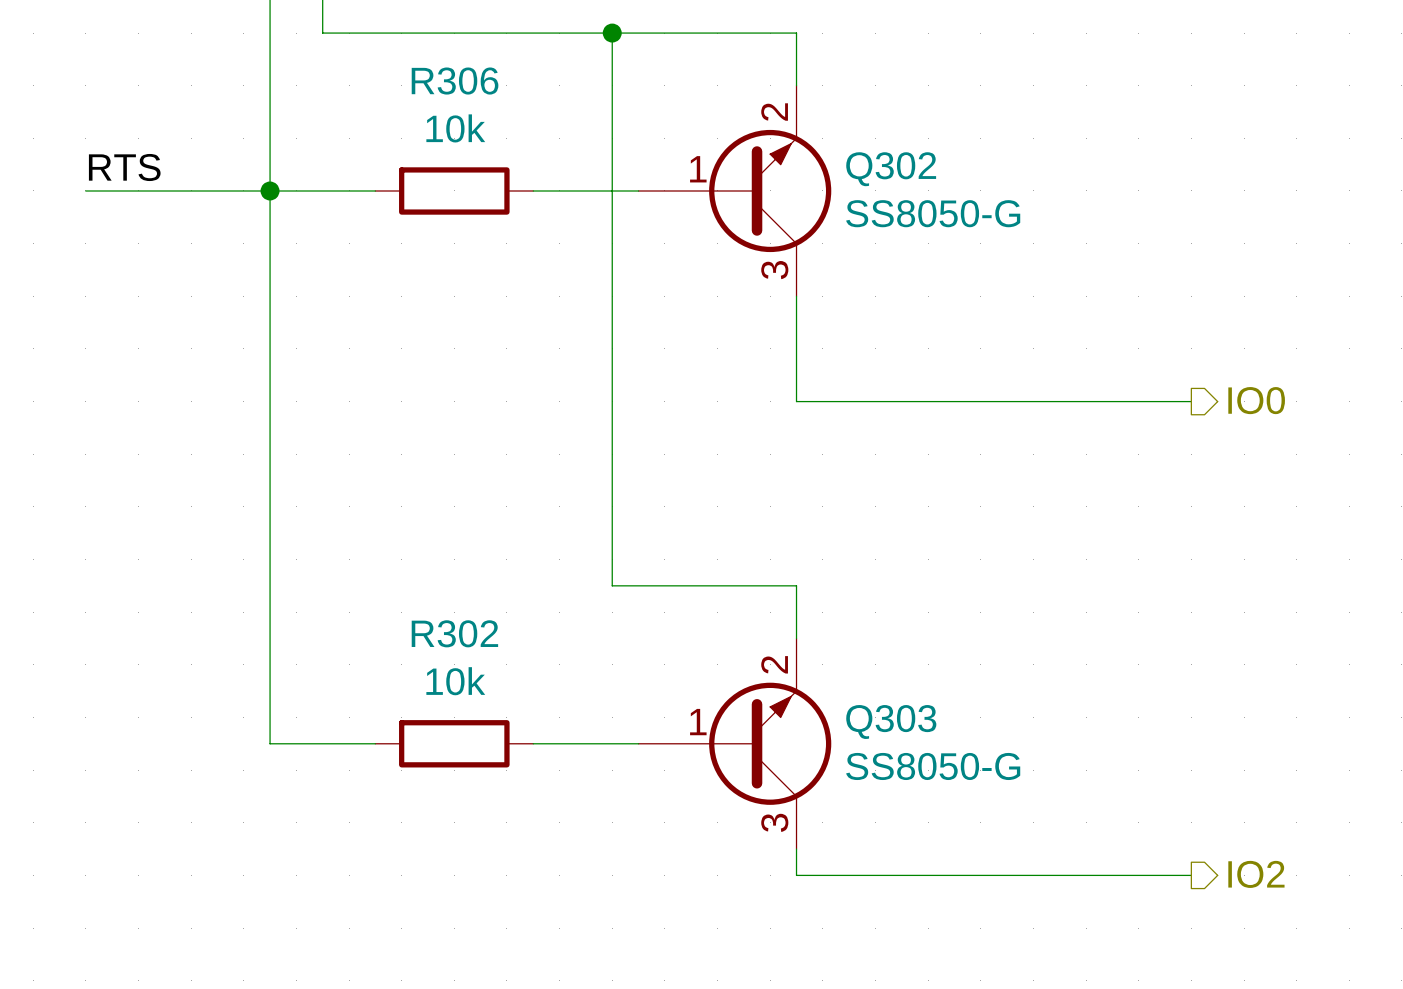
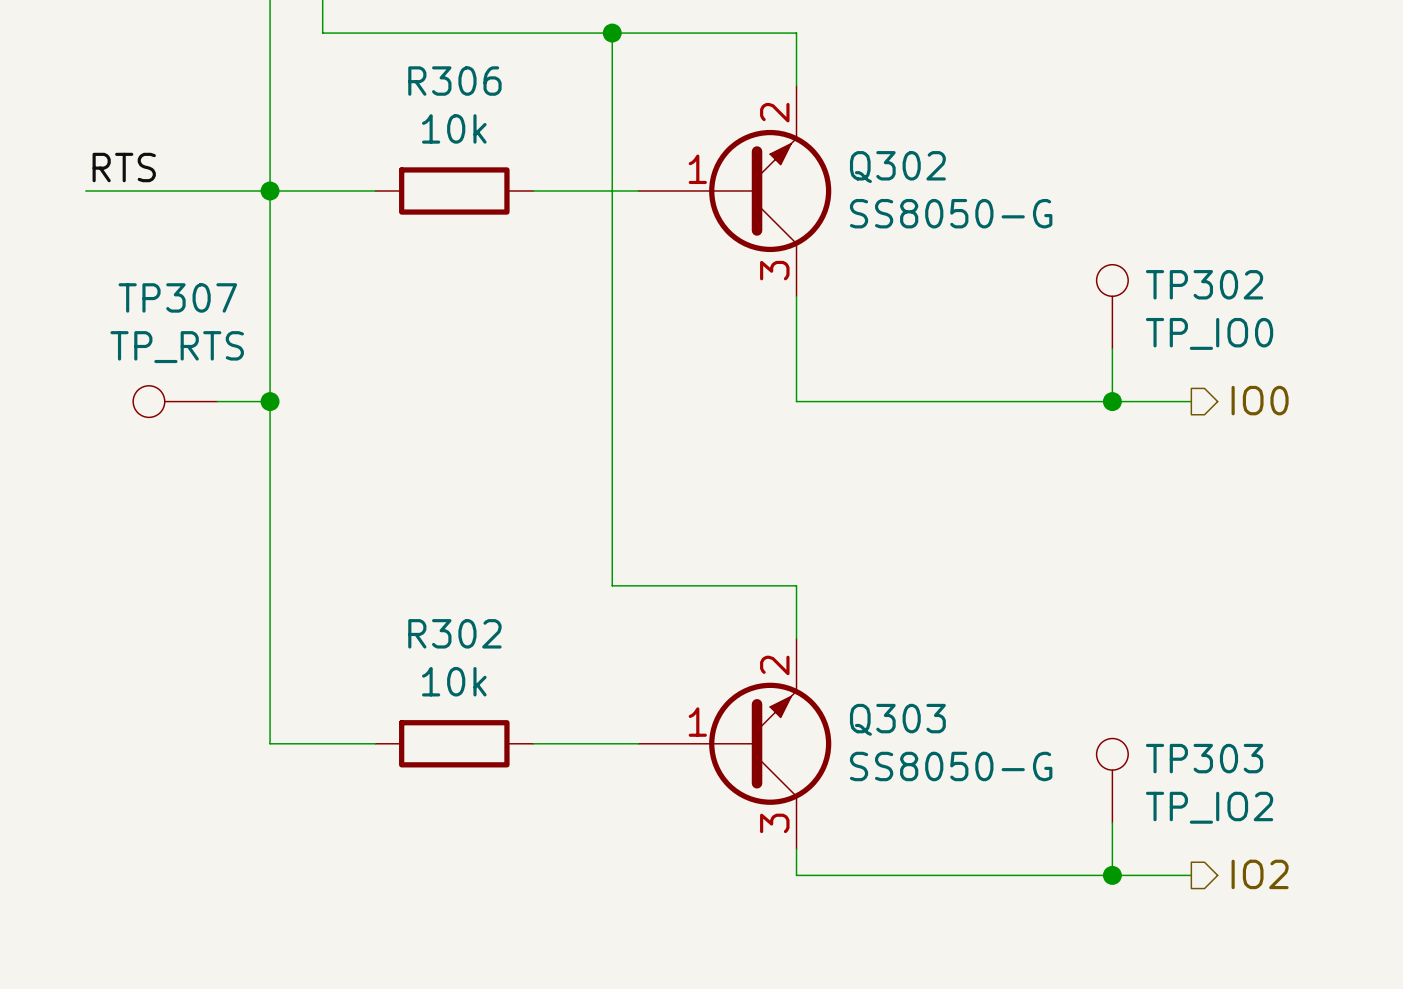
TP302: none -> TP_IO0 (1112, 306)
wire: none -> (1112, 348) (1112, 401)
TP307: none -> TP_RTS (175, 401)
wire: none -> (217, 401) (270, 401)
junction: none -> (270, 401)
junction: none -> (1112, 401)
TP303: none -> TP_IO2 (1112, 780)
wire: none -> (1112, 822) (1112, 875)
junction: none -> (1112, 875)

